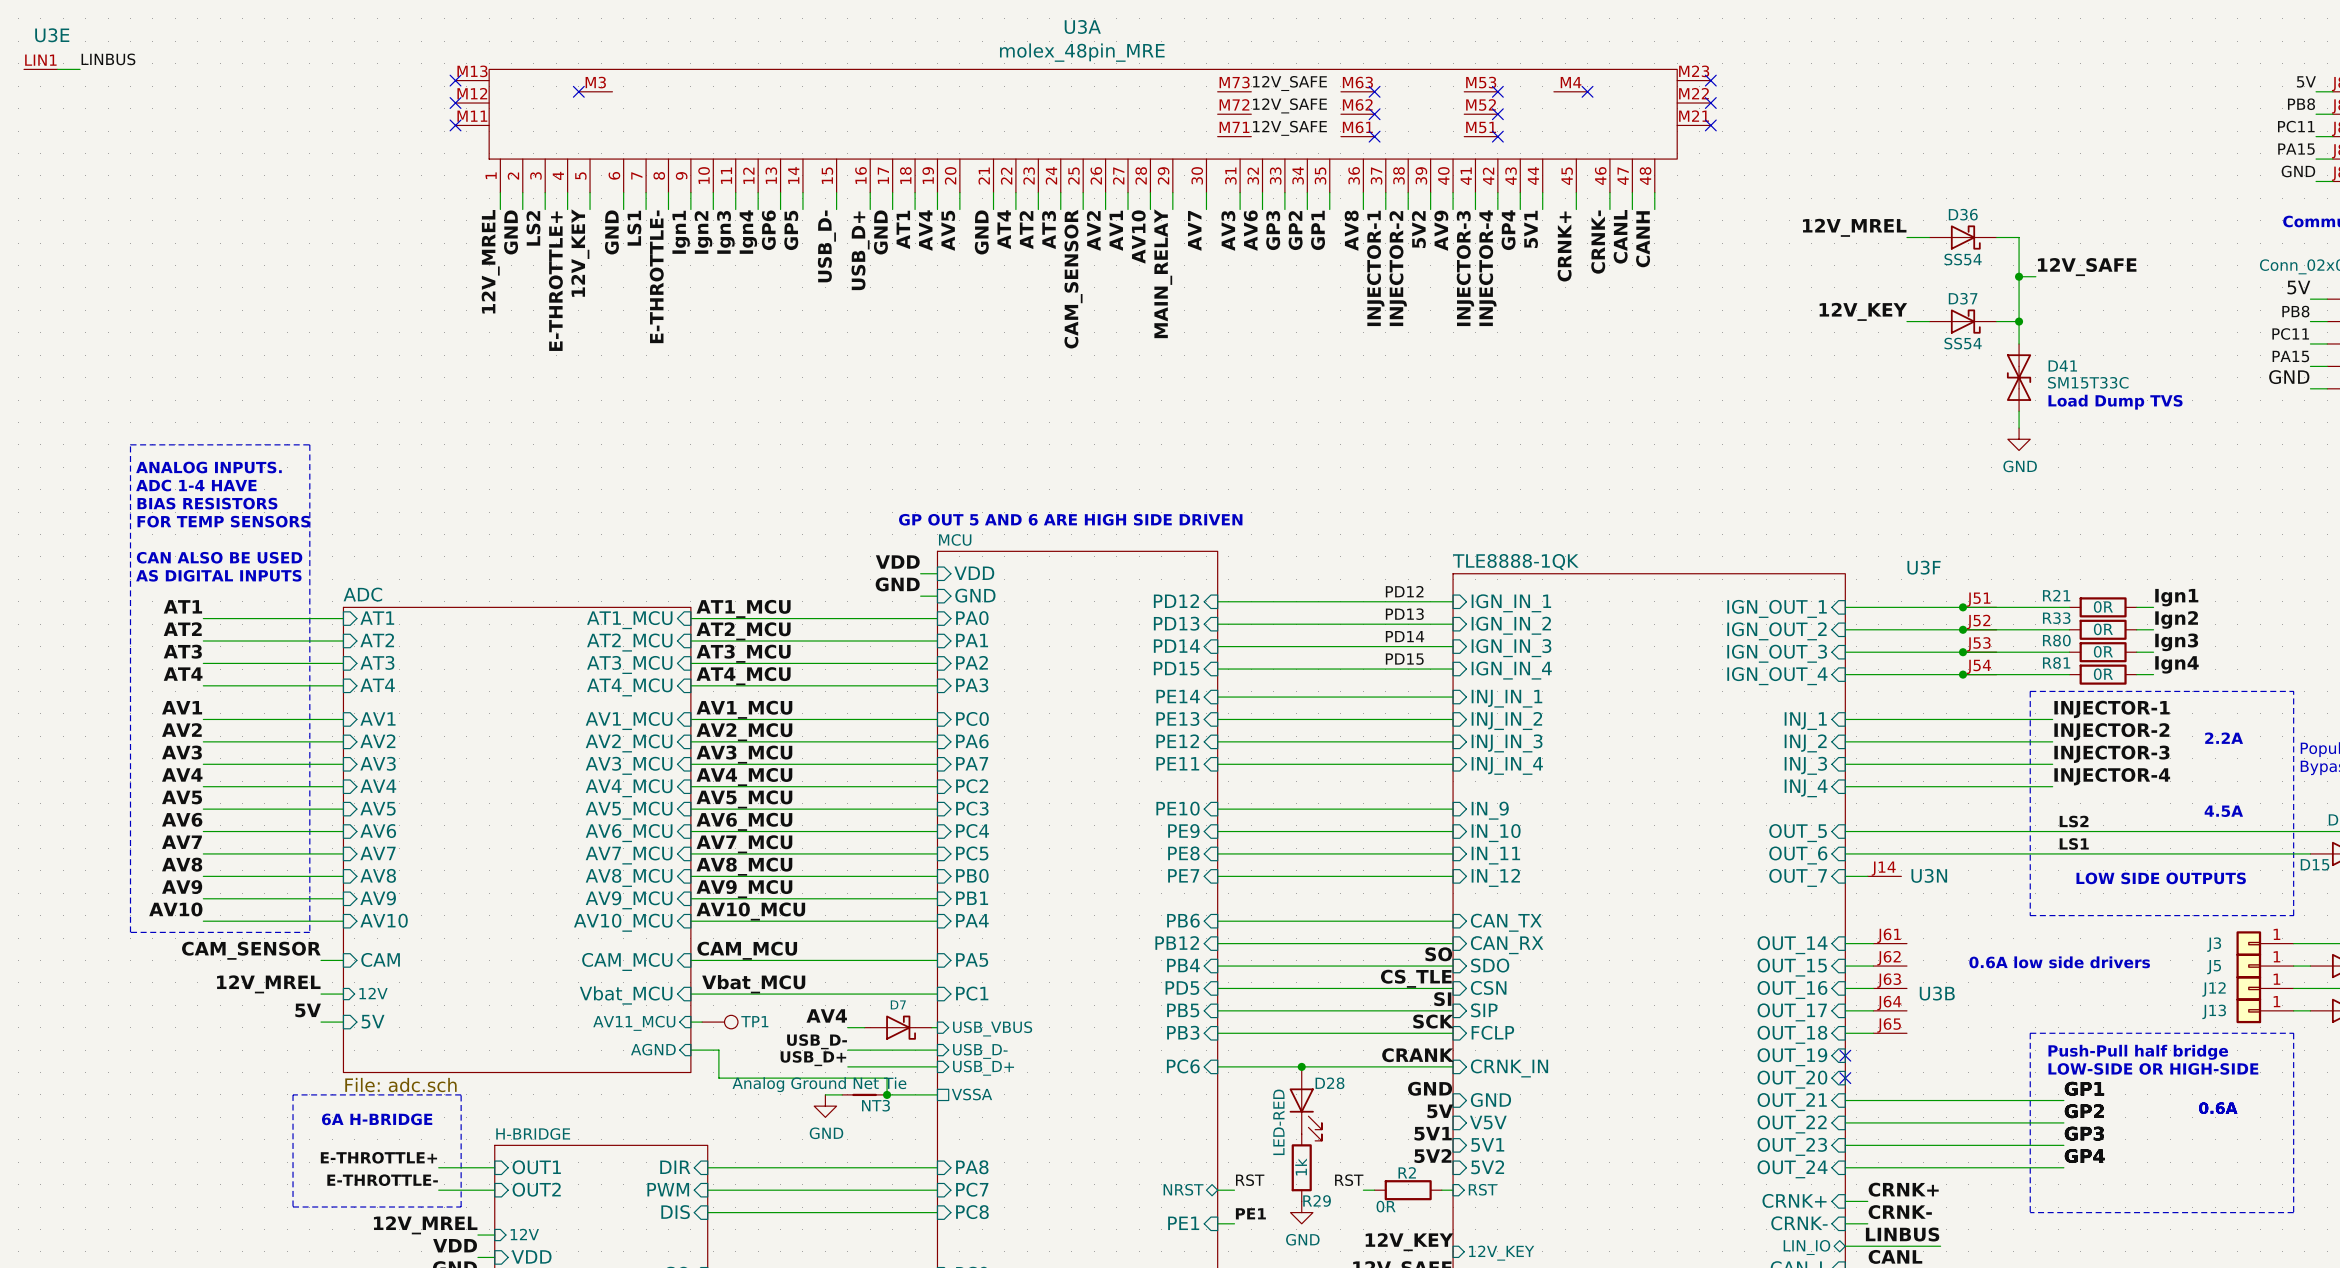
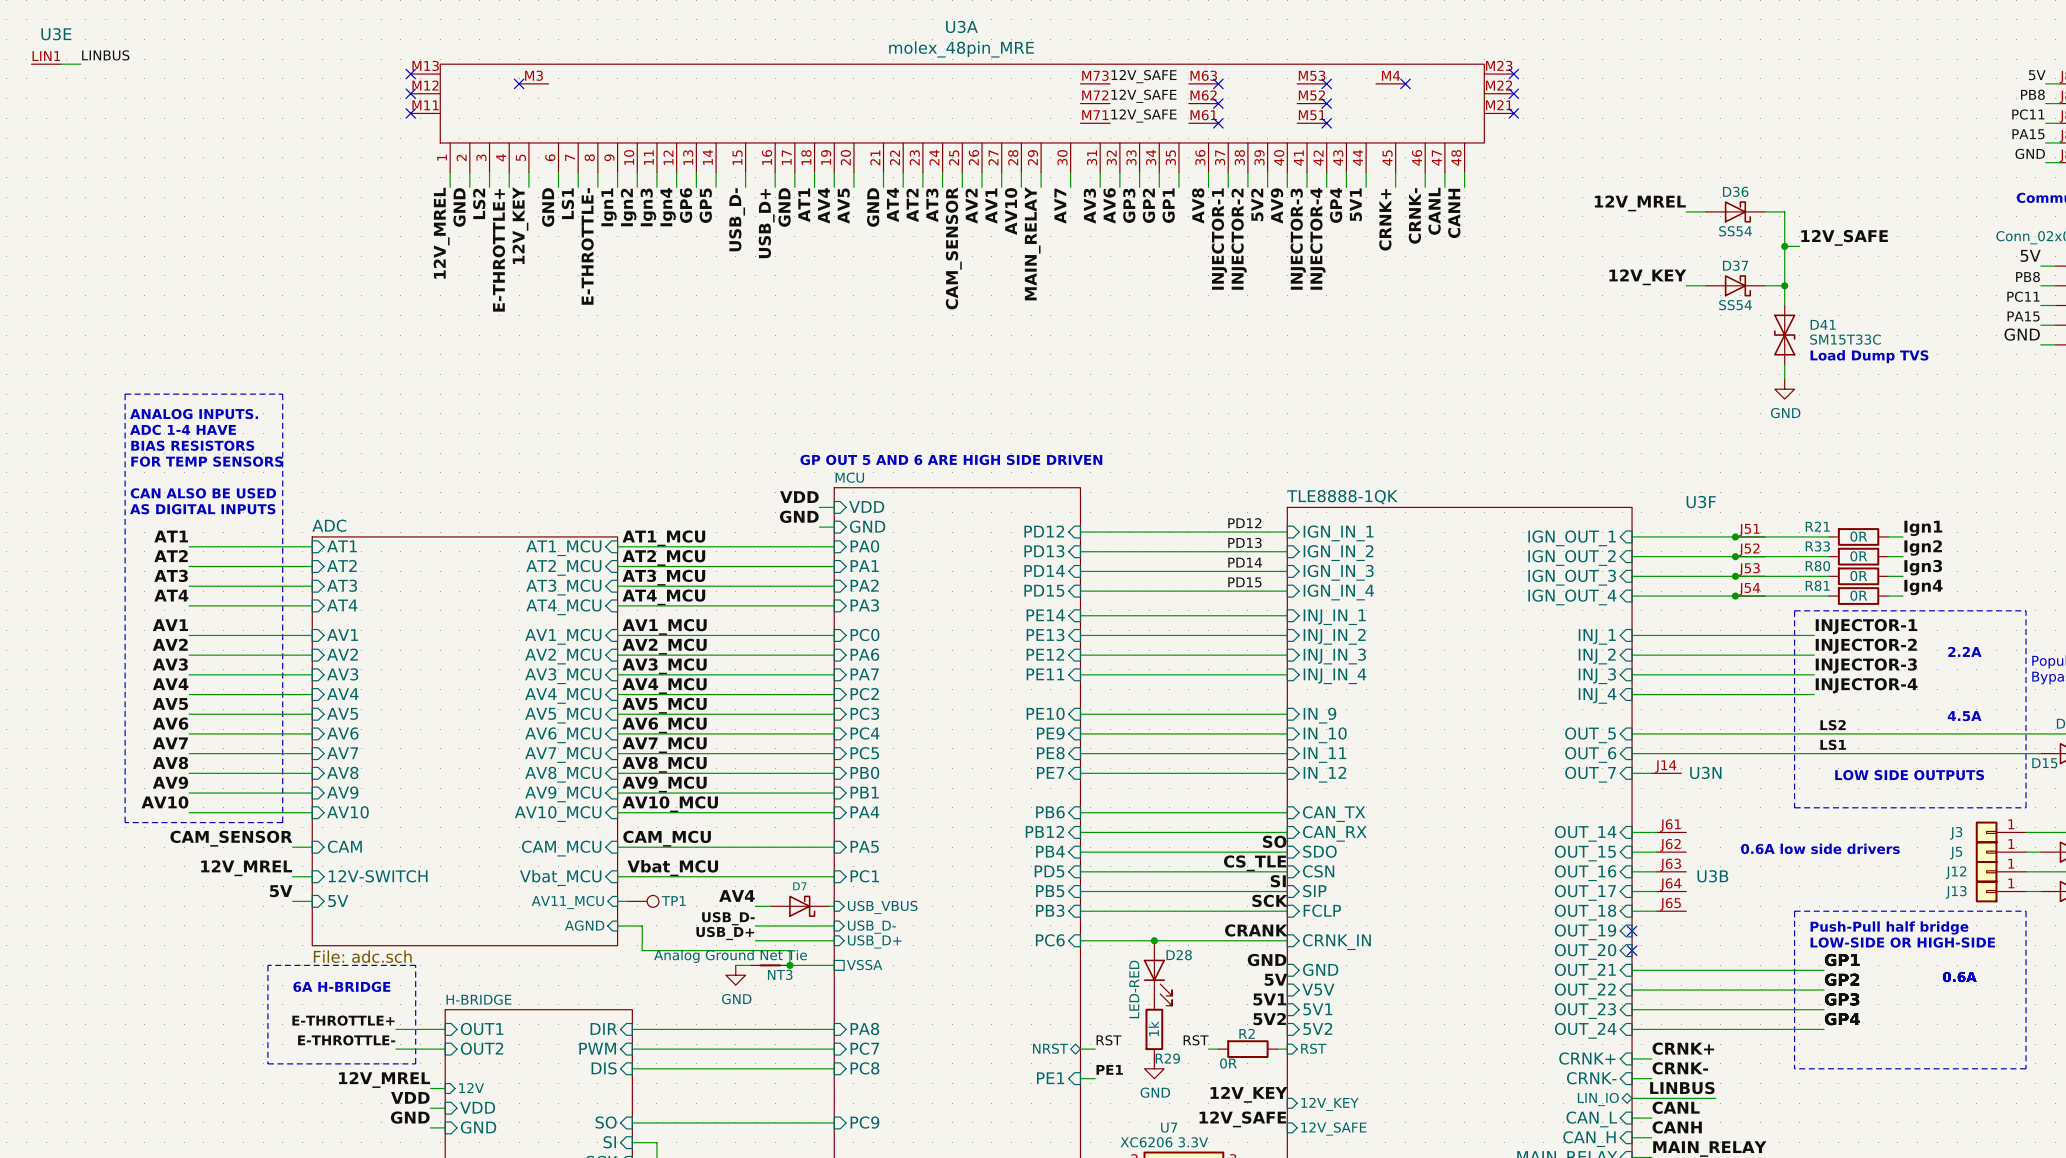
sheet pin: 12V (373, 993) -> 12V-SWITCH (378, 876)

